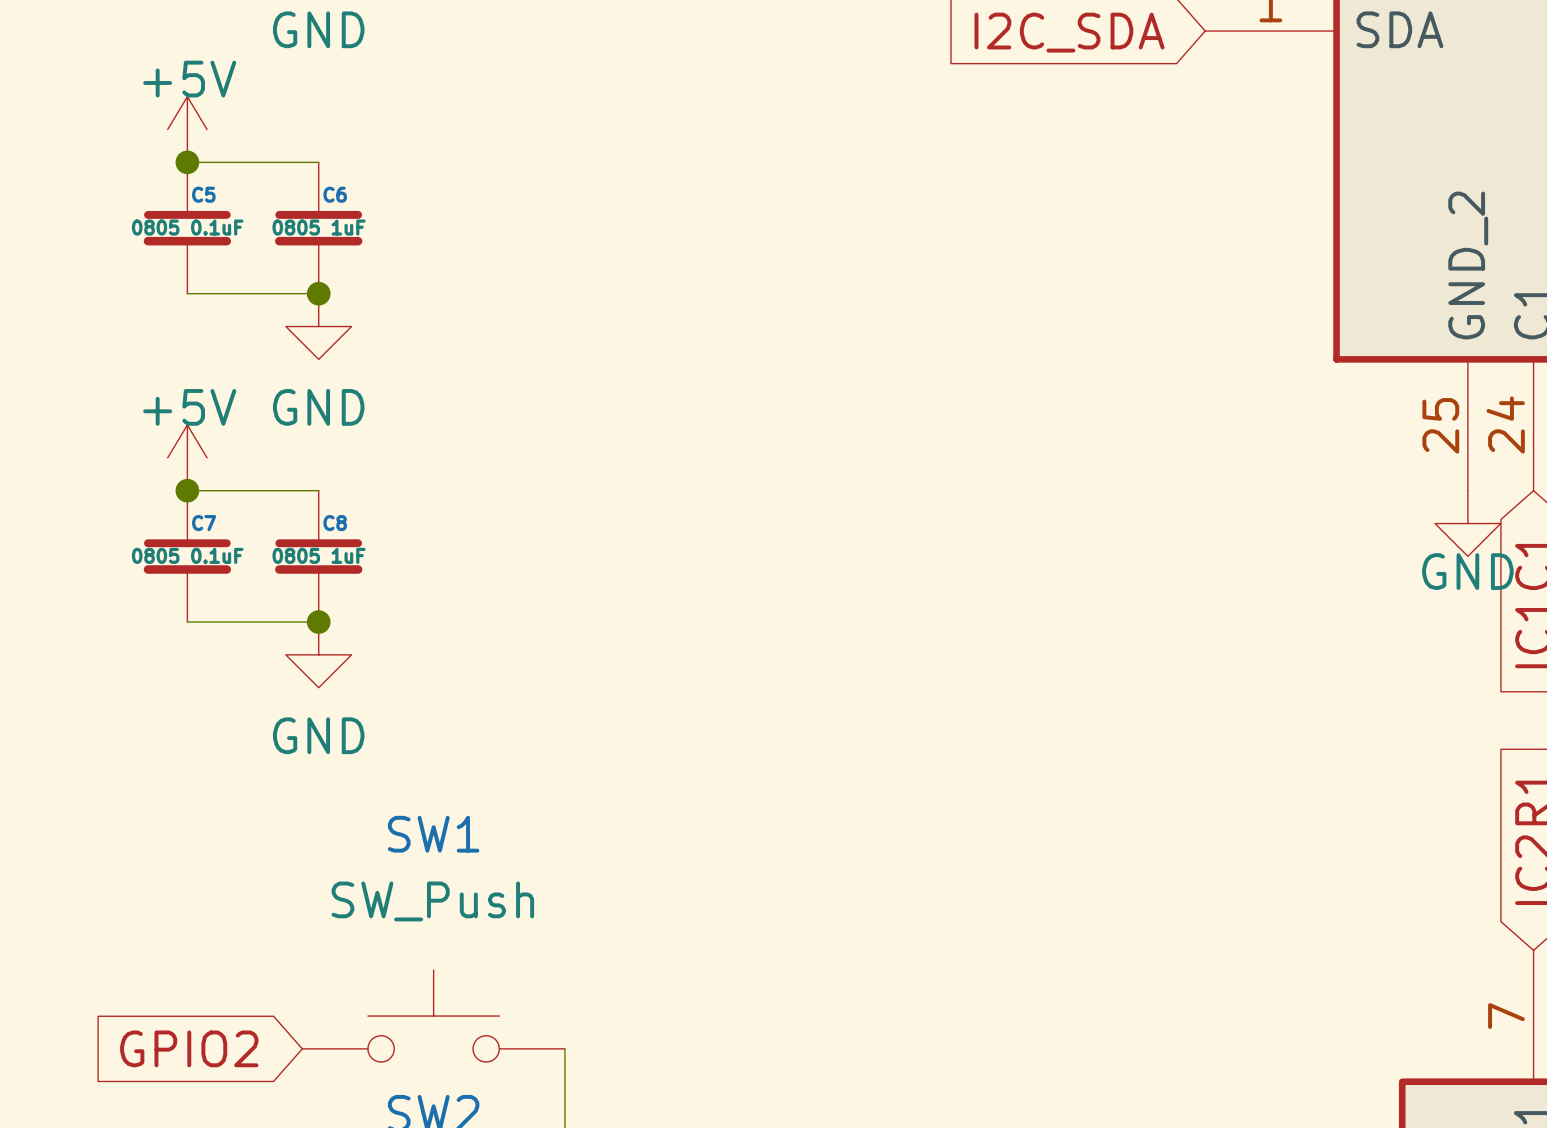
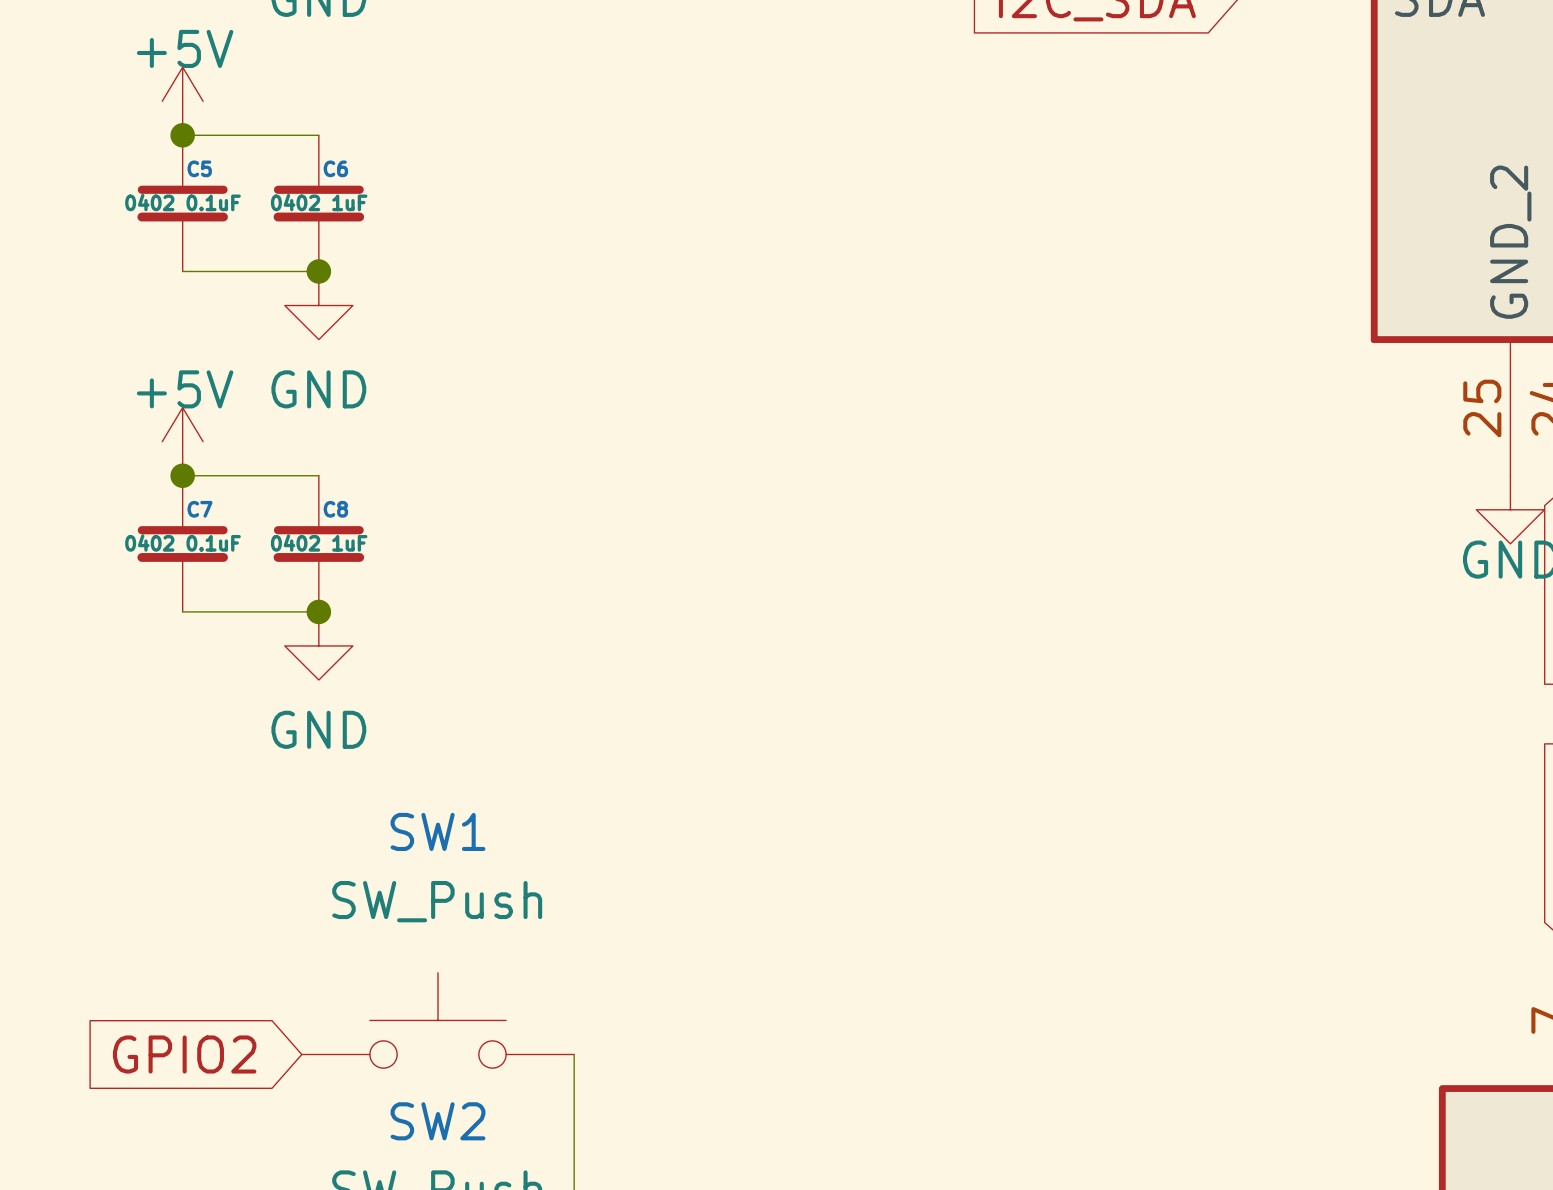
C5 value: 0805 0.1uF (187, 227) -> 0402 0.1uF (182, 202)
C6 value: 0805 1uF (319, 227) -> 0402 1uF (319, 202)
C7 value: 0805 0.1uF (187, 555) -> 0402 0.1uF (182, 543)
C8 value: 0805 1uF (319, 555) -> 0402 1uF (319, 543)

